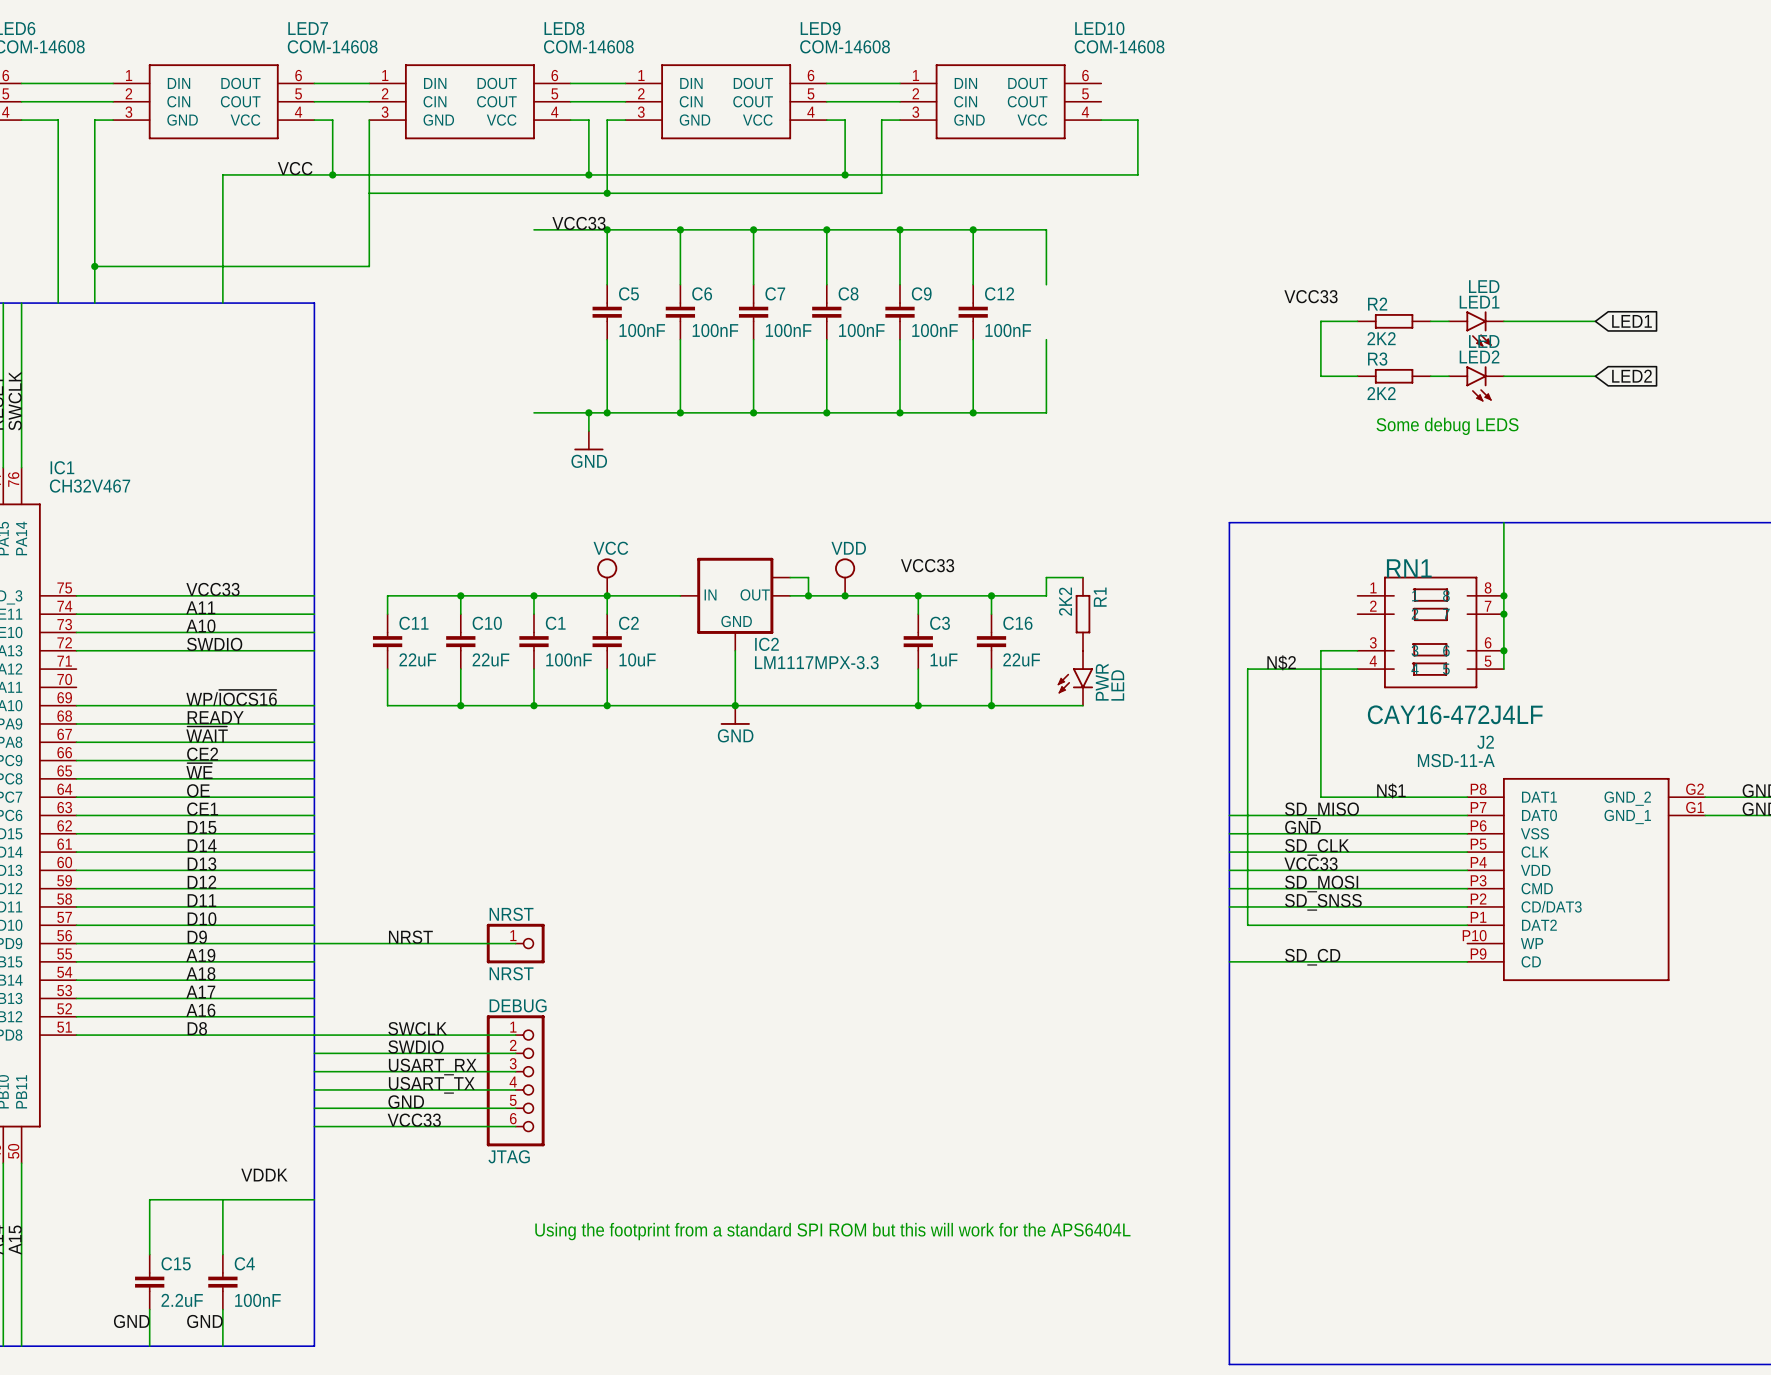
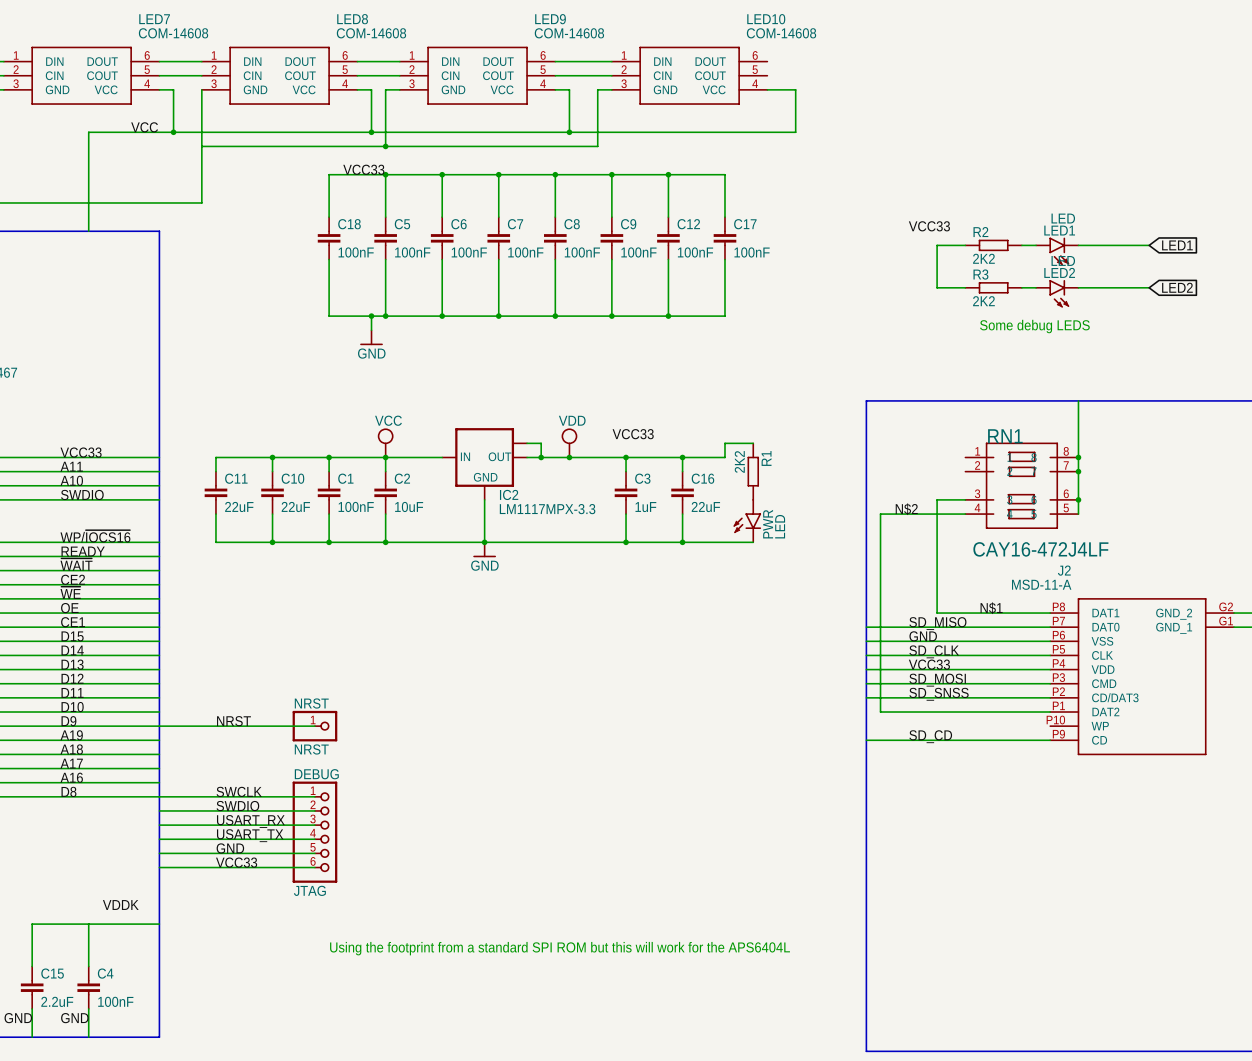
wire: none -> (329, 174) (329, 217)
C18: none -> 100nF (329, 238)
C17: none -> 100nF (724, 238)
wire: none -> (329, 259) (329, 316)

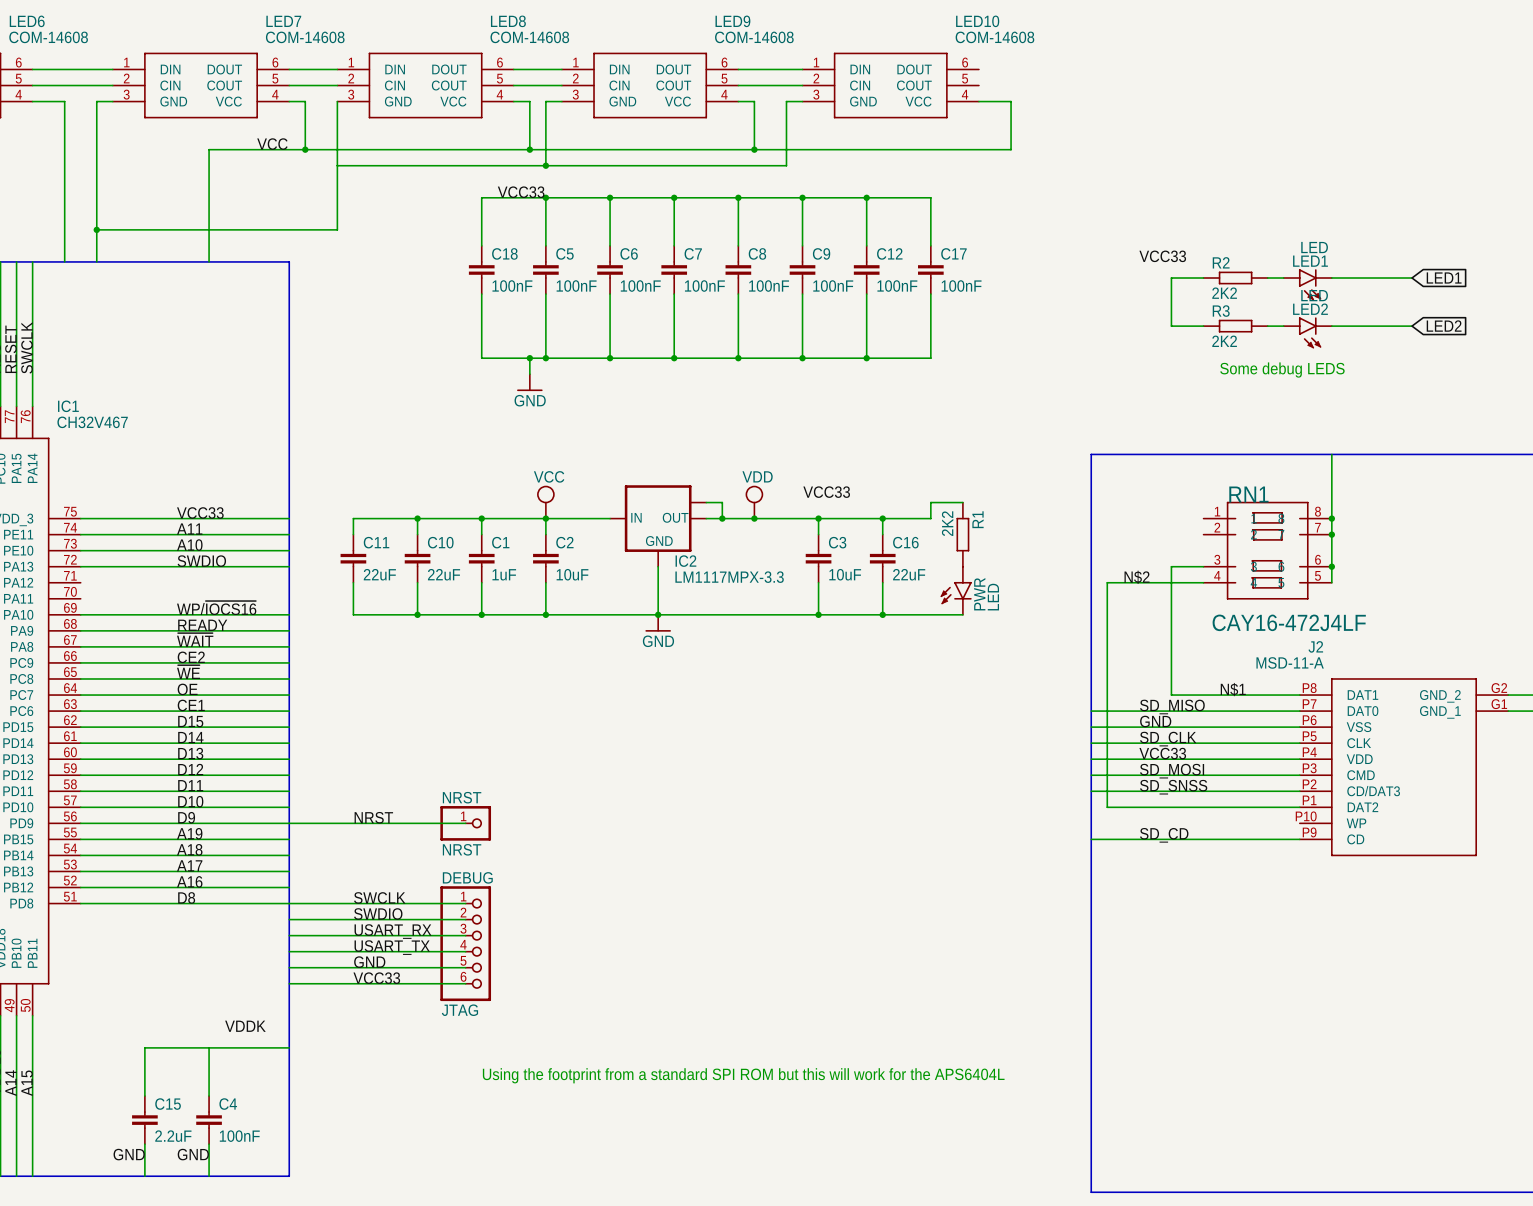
C1 value: 100nF (356, 506) -> 1uF (504, 574)
C3 value: 1uF (645, 507) -> 10uF (845, 574)

